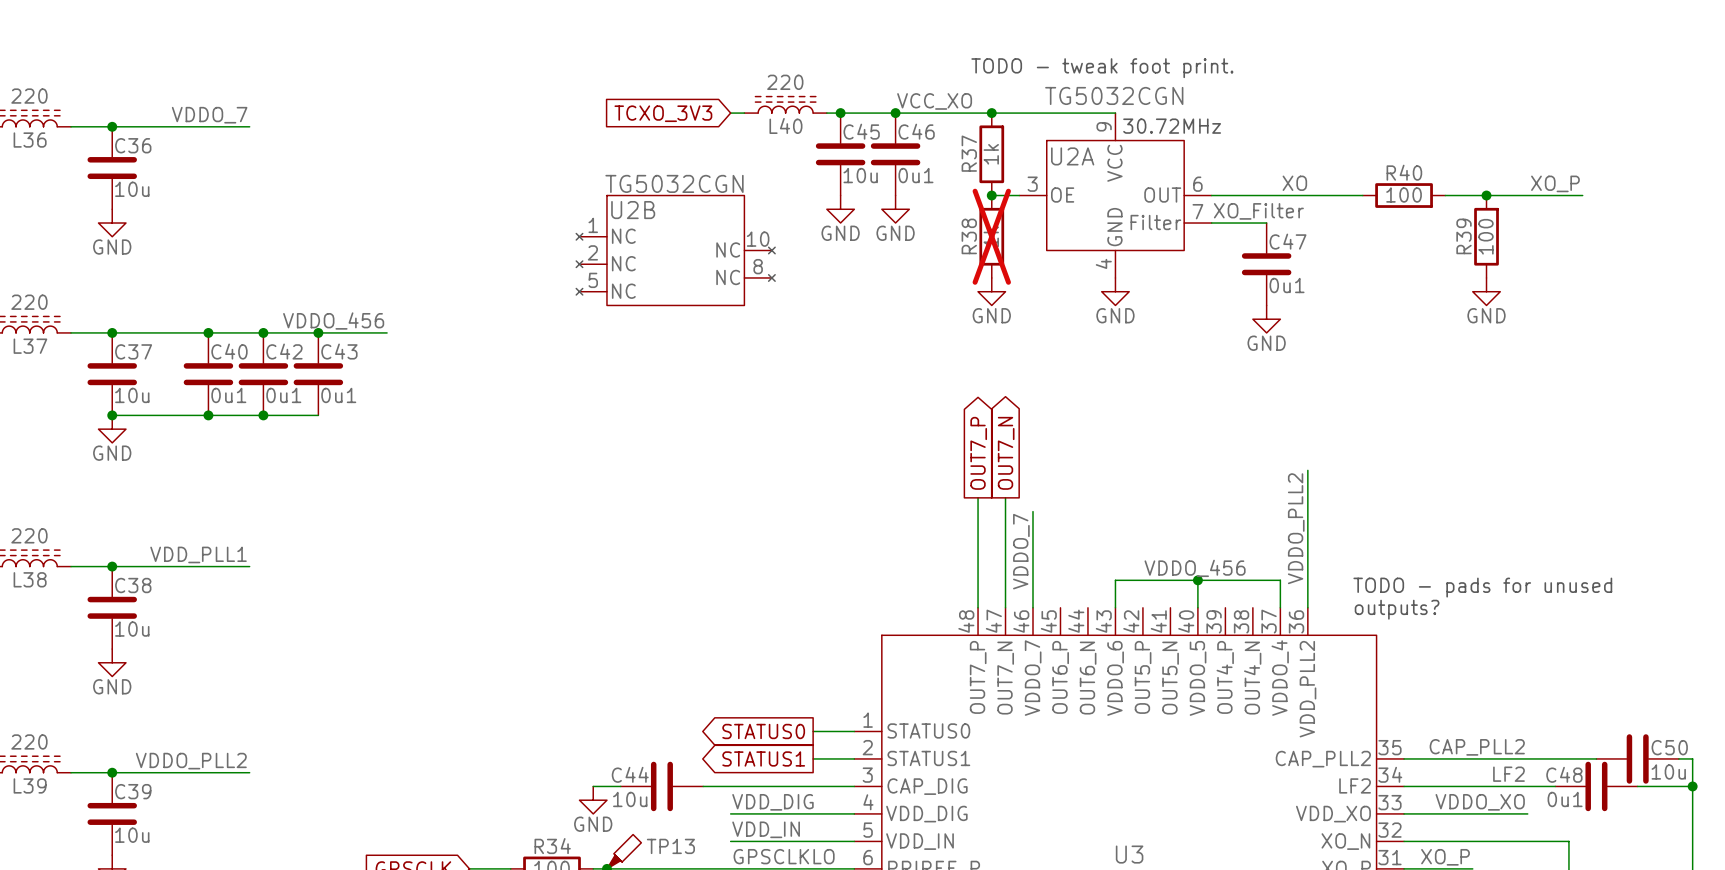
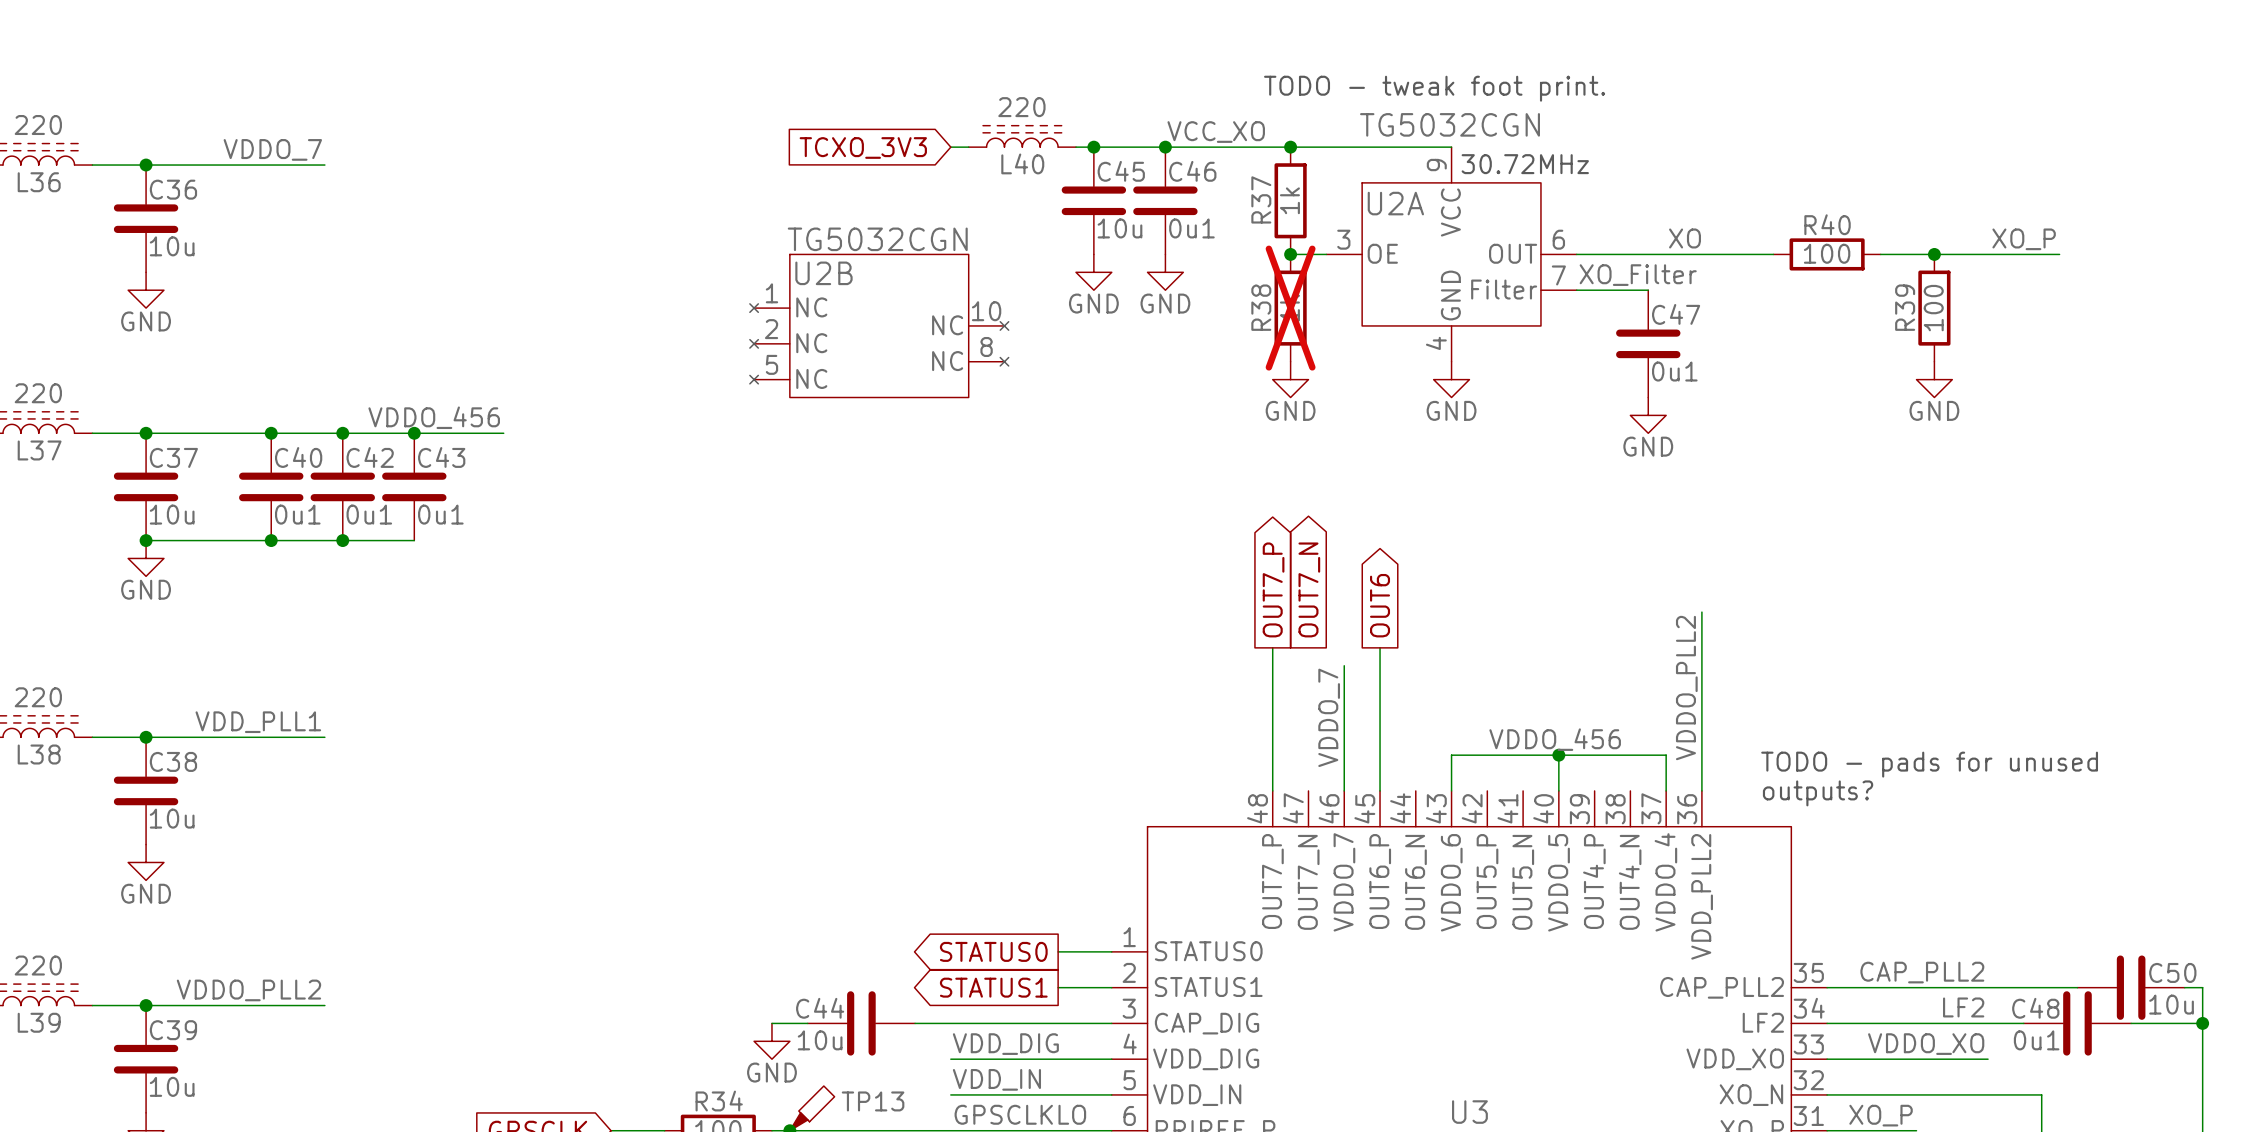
global label: none -> OUT6 (1380, 605)
wire: (1005, 497) (1005, 607) -> (1380, 647) (1380, 790)

